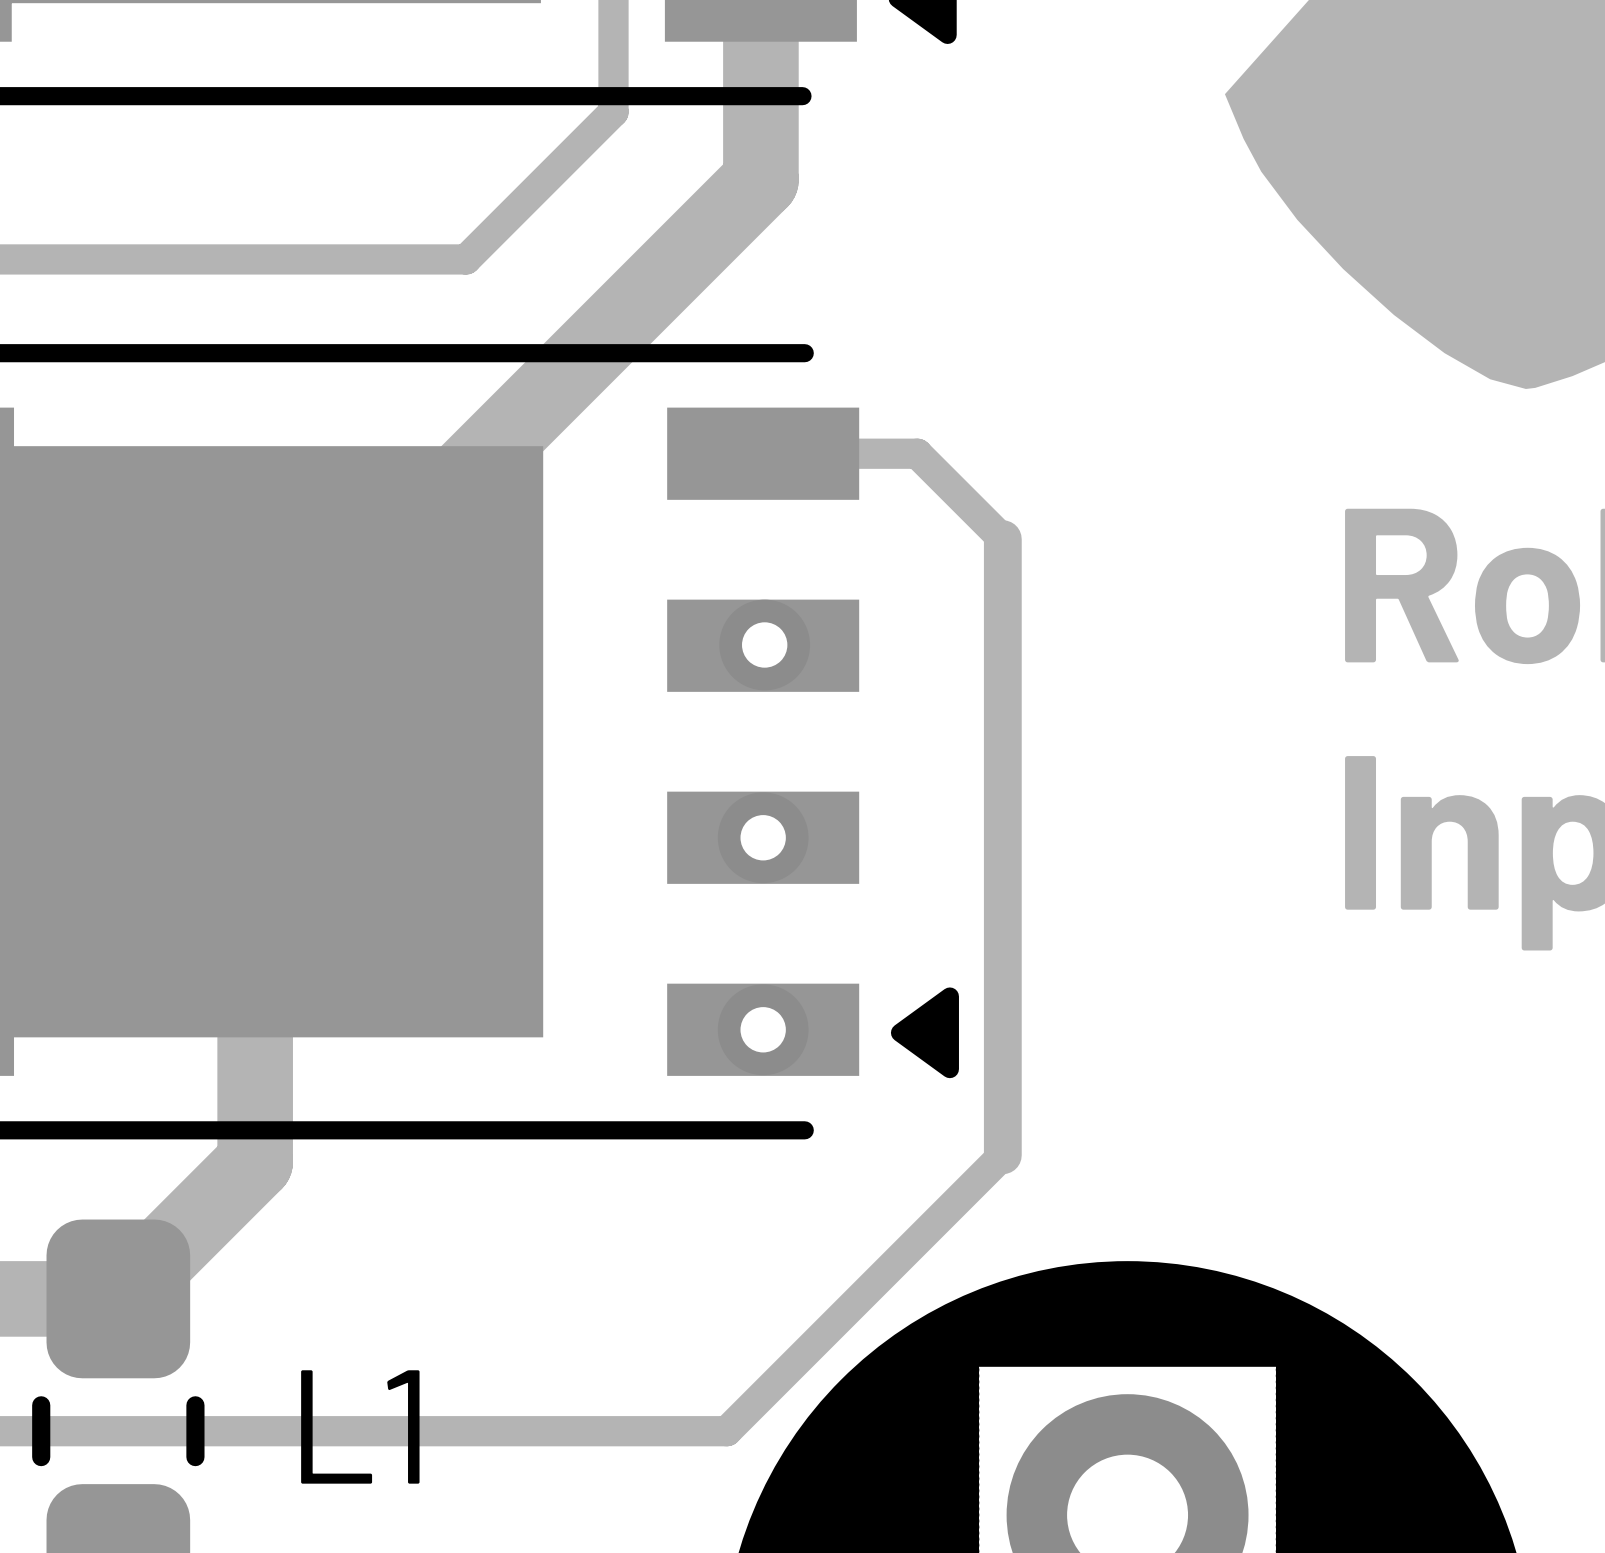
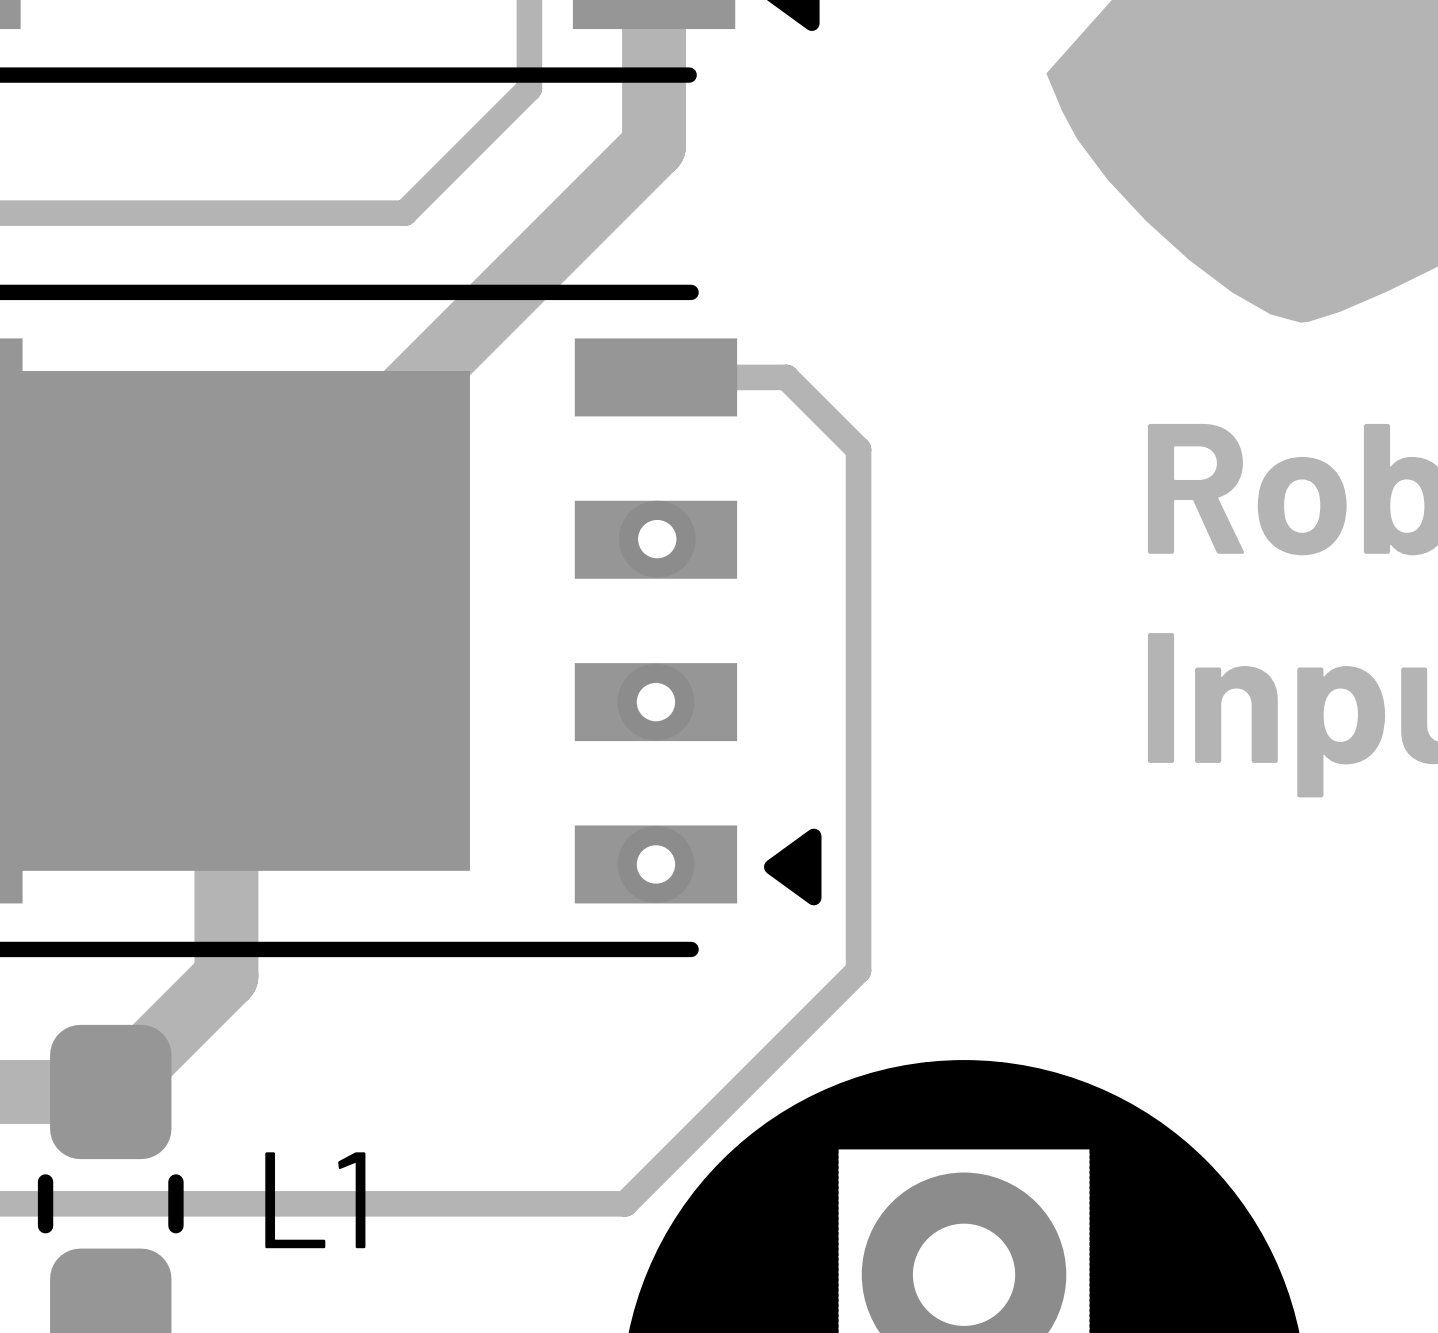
track width: thick (1002, 539) (1002, 1155) -> thin (858, 449) (858, 970)

